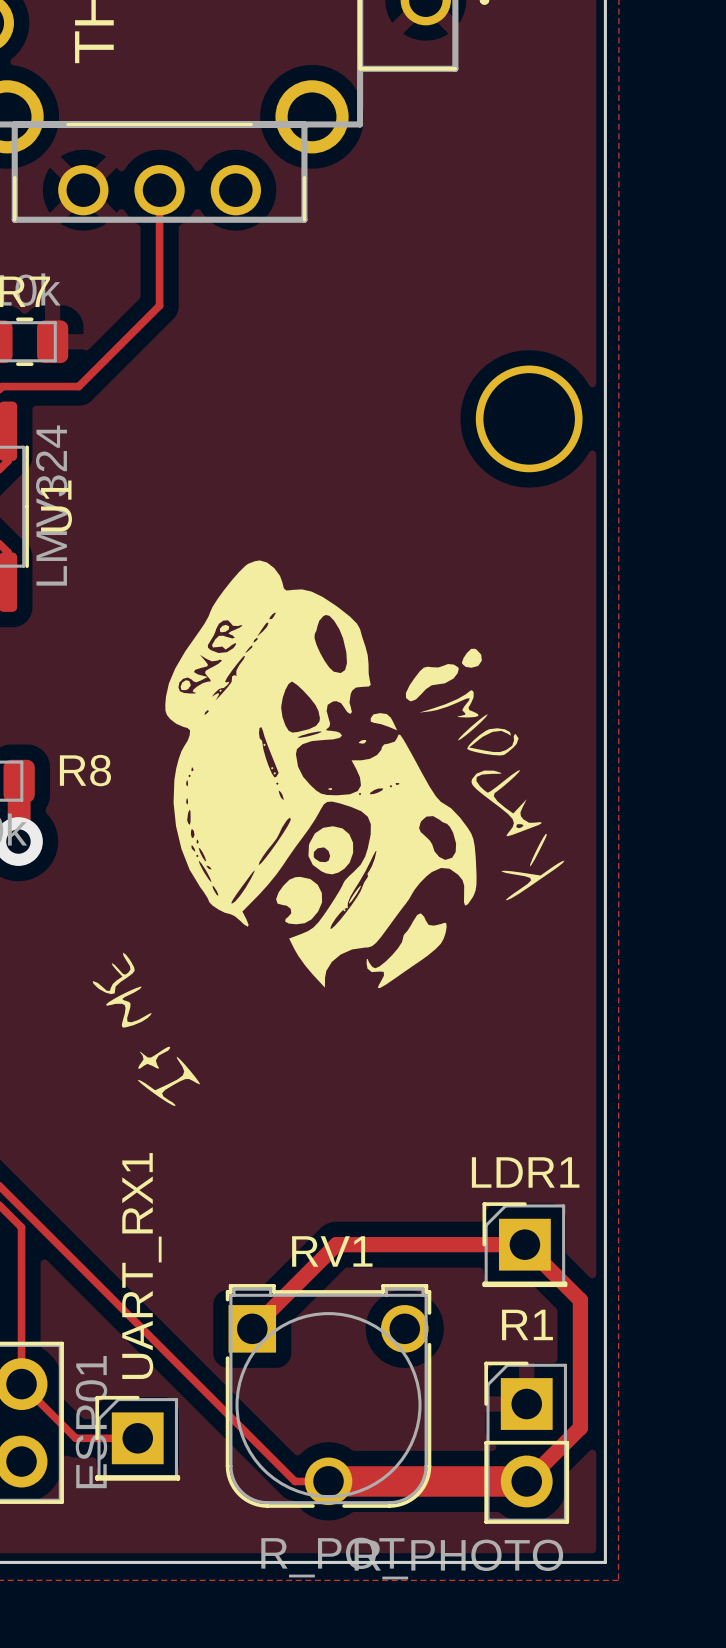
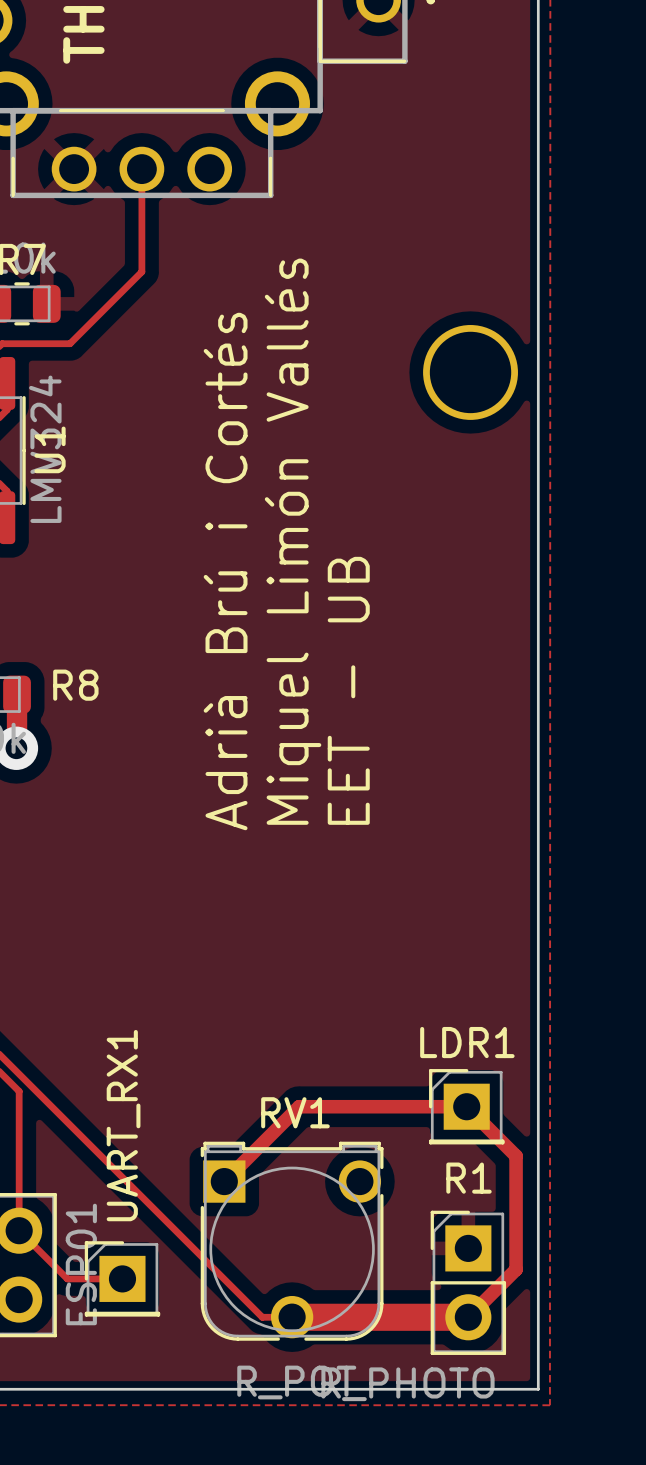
drawing: [92, 560, 565, 1107] -> none
text: none -> Miquel Limón Vallés (293, 541)
text: none -> Adrià Brú i Cortés (225, 571)
text: none -> EET - UB (348, 690)

